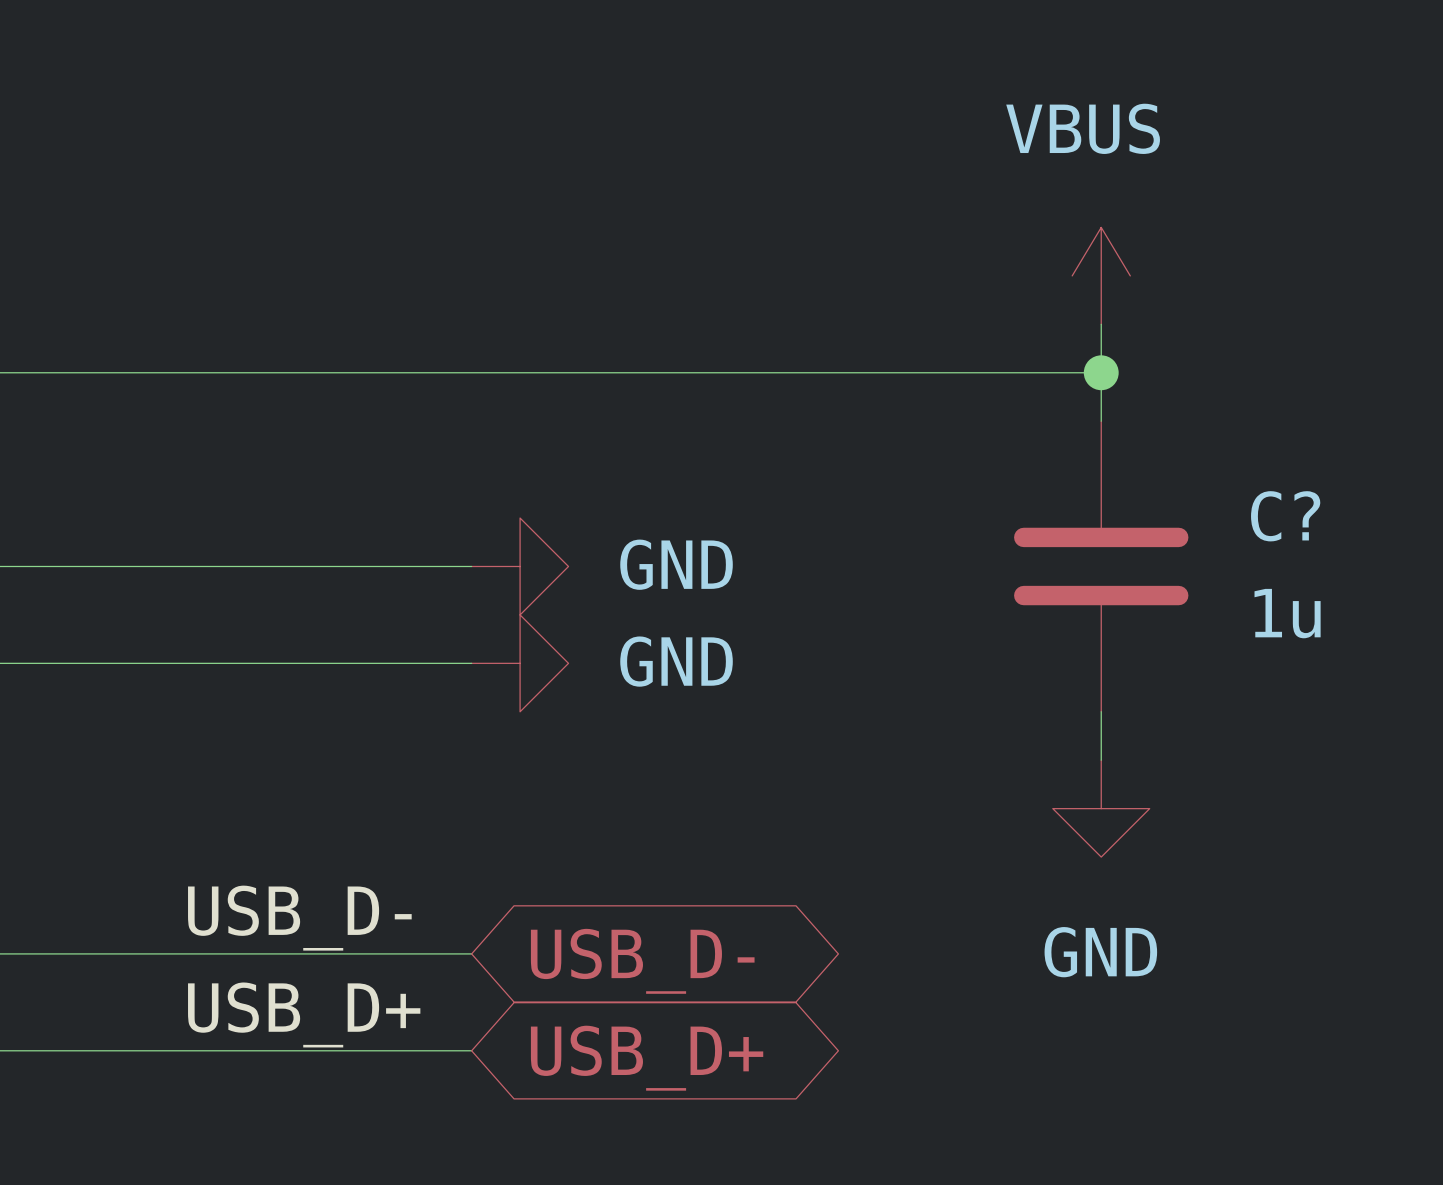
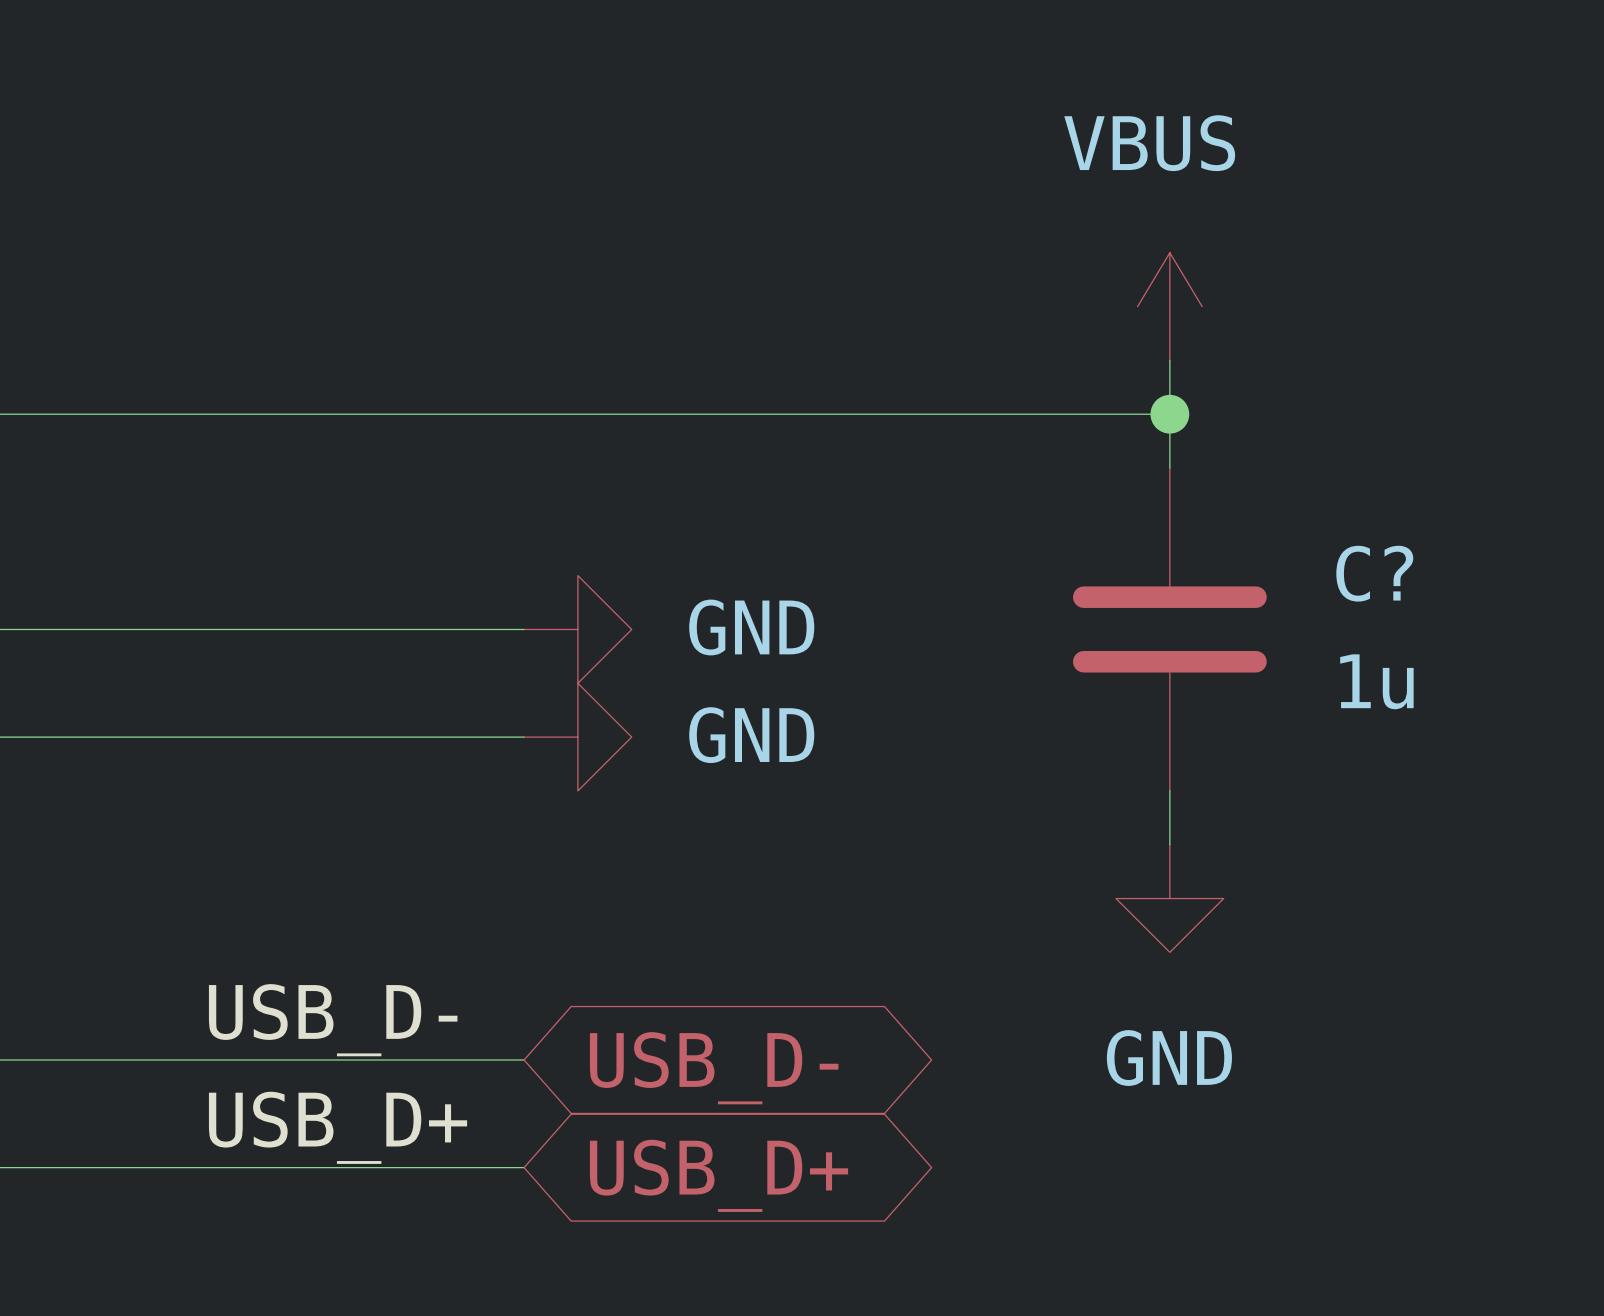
power symbol position: VBUS (1101, 275) -> VBUS (1169, 306)
wire: (1101, 324) (1101, 421) -> (1169, 360) (1169, 468)
wire: (1052, 372) (1101, 372) -> none
junction position: (1101, 372) -> (1169, 414)
C? position: (1101, 566) -> (1169, 629)
wire: (1101, 711) (1101, 760) -> (1169, 790) (1169, 844)
power symbol position: GND (1101, 808) -> GND (1169, 898)

